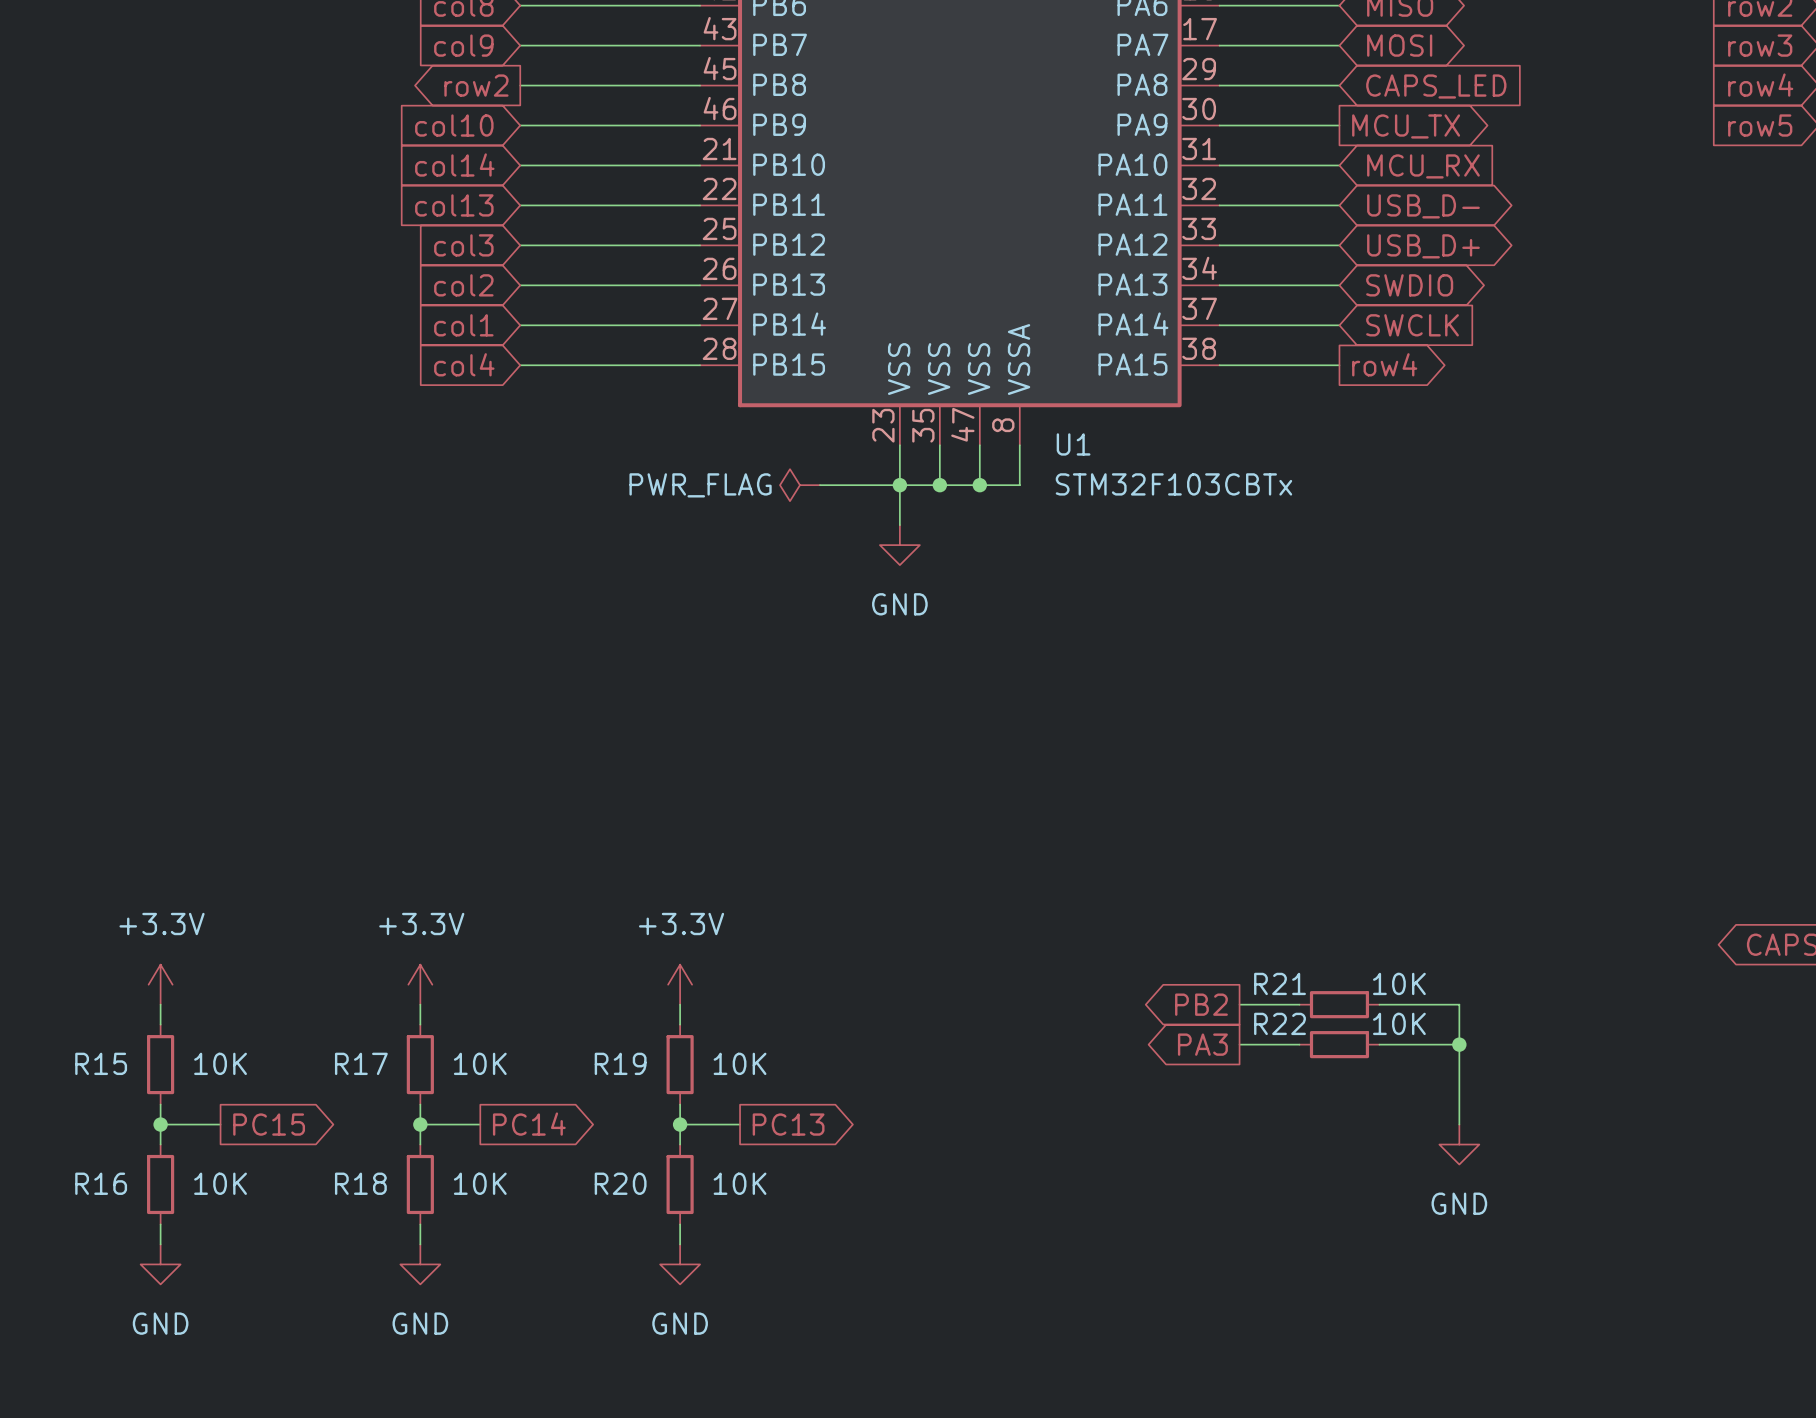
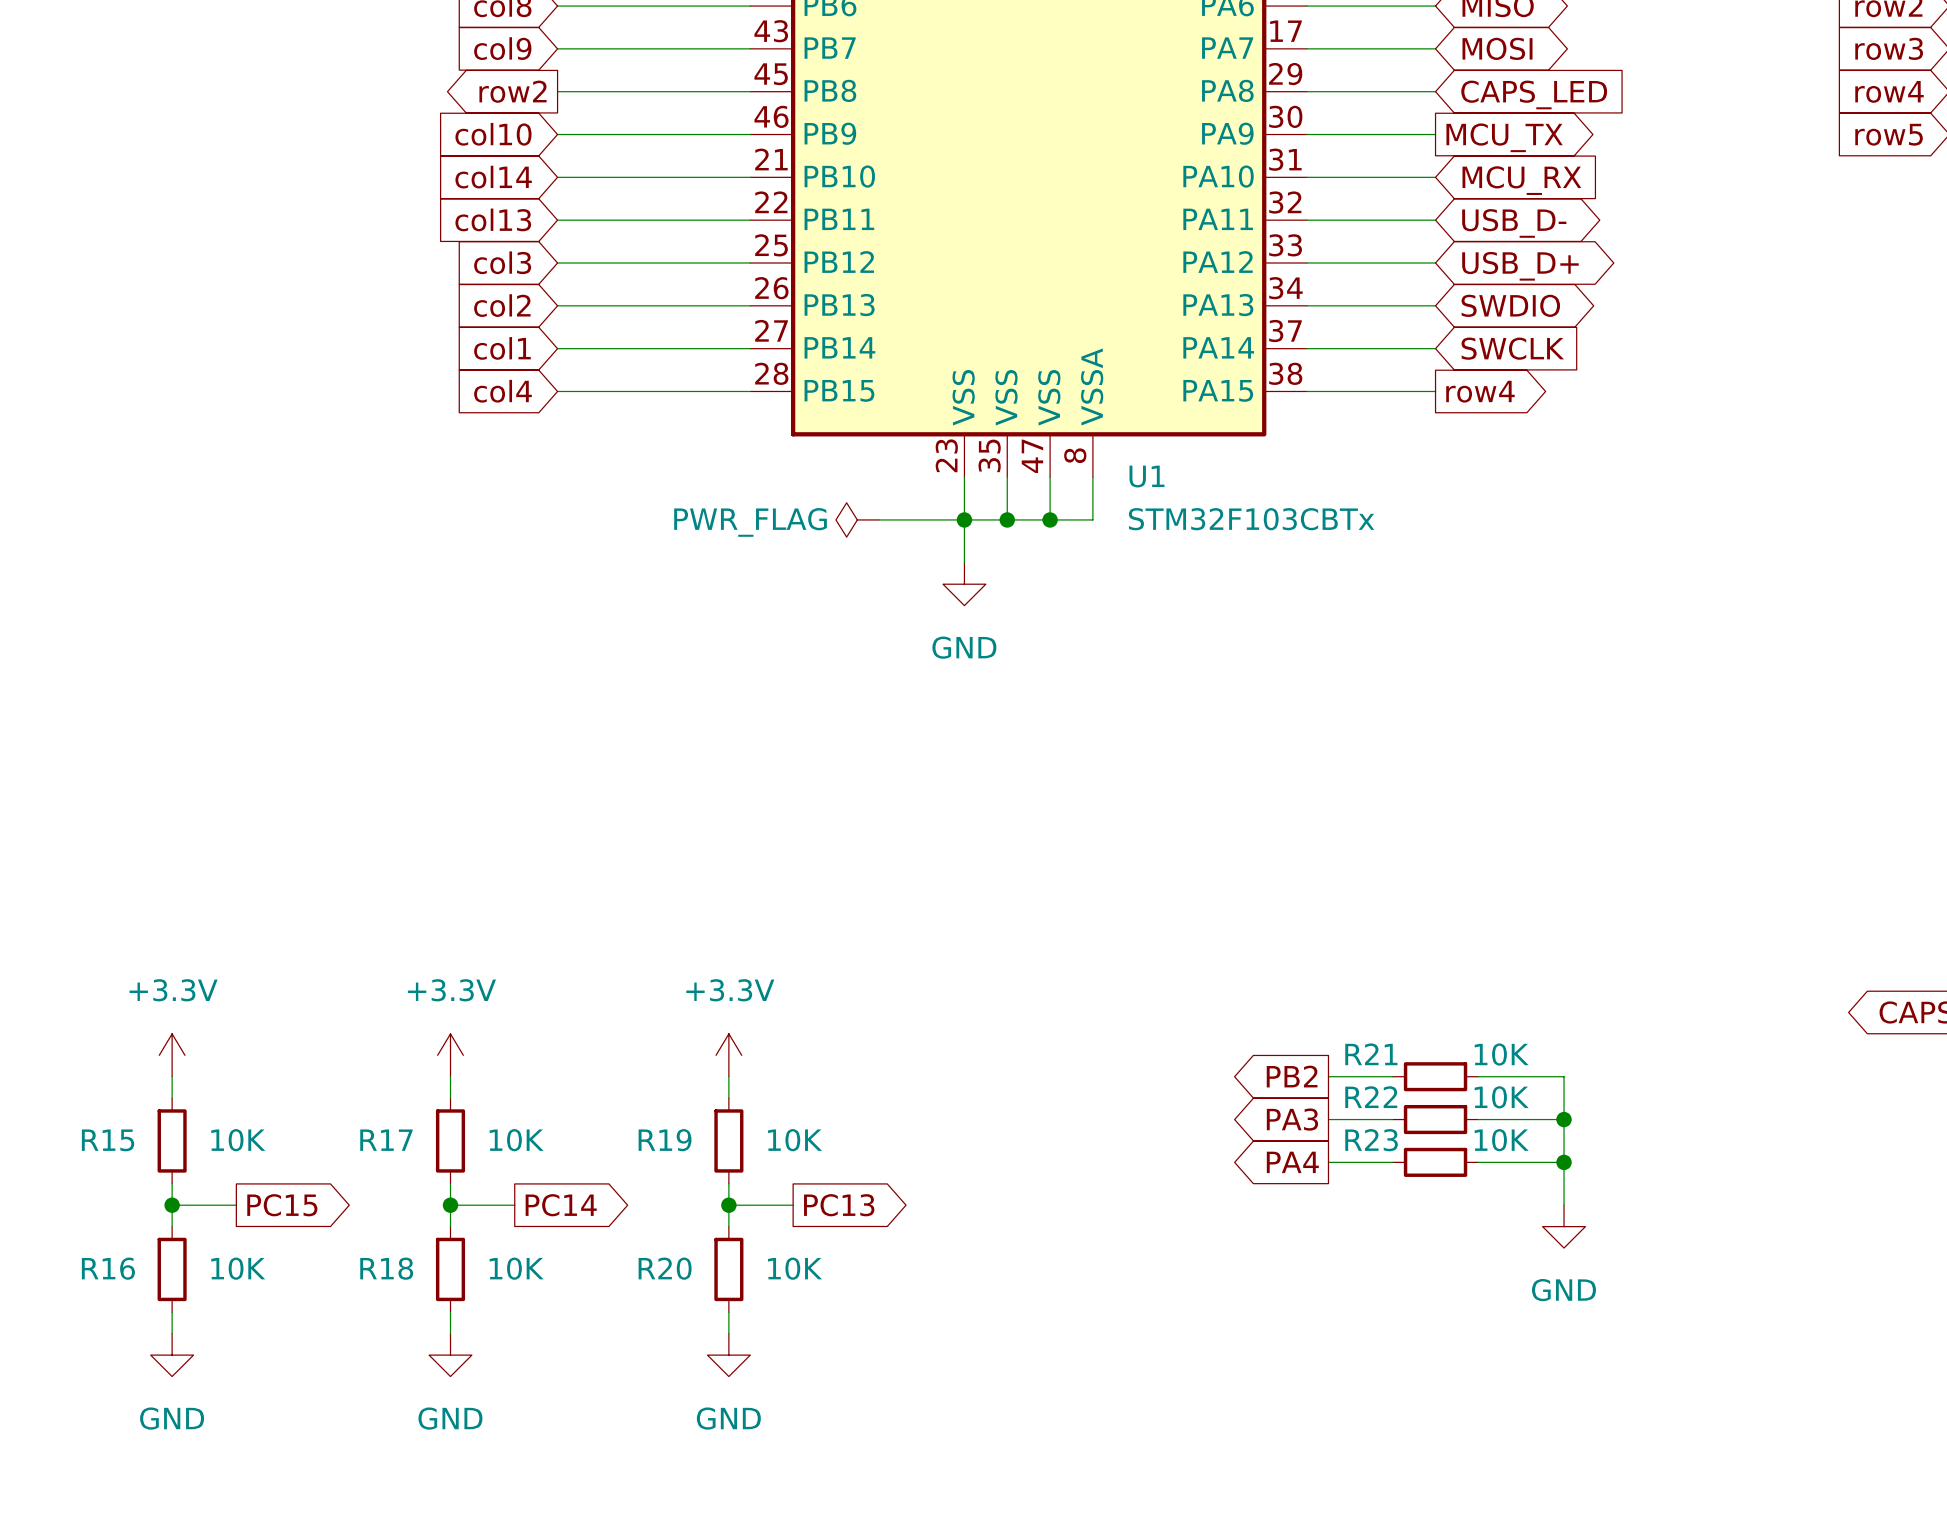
global label: none -> PA4 (1292, 1162)
wire: none -> (1328, 1162) (1392, 1162)
R23: none -> 10K (1435, 1162)
wire: none -> (1478, 1162) (1564, 1162)
junction: none -> (1564, 1162)

